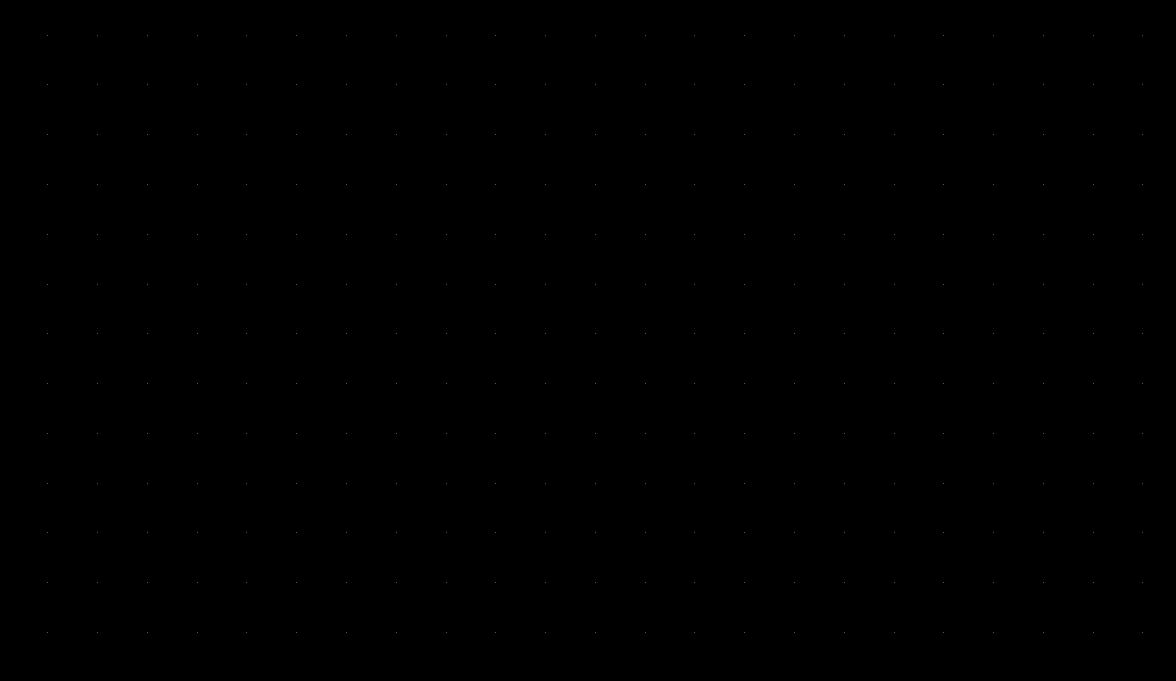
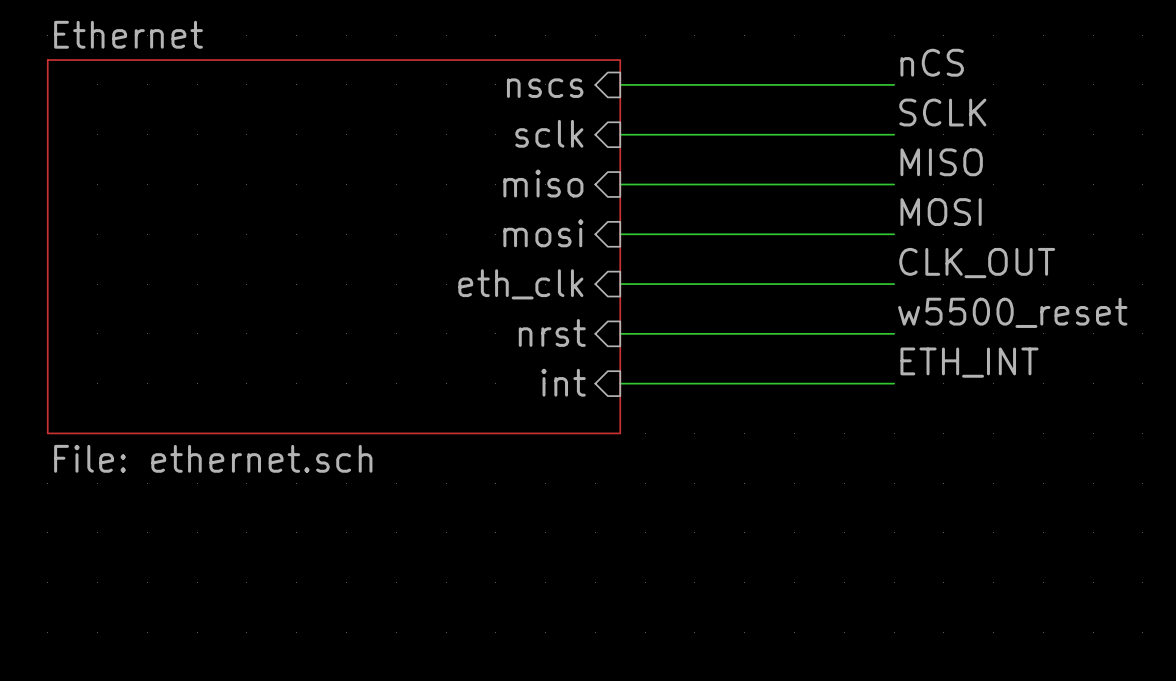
label: none -> nCS (932, 62)
wire: none -> (620, 84) (894, 84)
sheet pin: none -> nscs (545, 88)
label: none -> SCLK (942, 112)
sheet pin: none -> sclk (549, 133)
wire: none -> (620, 134) (894, 134)
label: none -> MISO (941, 162)
sheet pin: none -> miso (543, 183)
wire: none -> (620, 184) (894, 184)
label: none -> MOSI (941, 212)
sheet pin: none -> mosi (543, 233)
wire: none -> (620, 234) (894, 234)
sheet Ethernet: none -> File: ethernet.sch (333, 246)
label: none -> CLK_OUT (977, 263)
sheet pin: none -> eth_clk (520, 284)
wire: none -> (620, 284) (894, 284)
label: none -> w5500_reset (1012, 312)
sheet pin: none -> nrst (552, 332)
wire: none -> (620, 333) (894, 333)
label: none -> ETH_INT (969, 362)
sheet pin: none -> int (563, 382)
wire: none -> (620, 383) (894, 383)

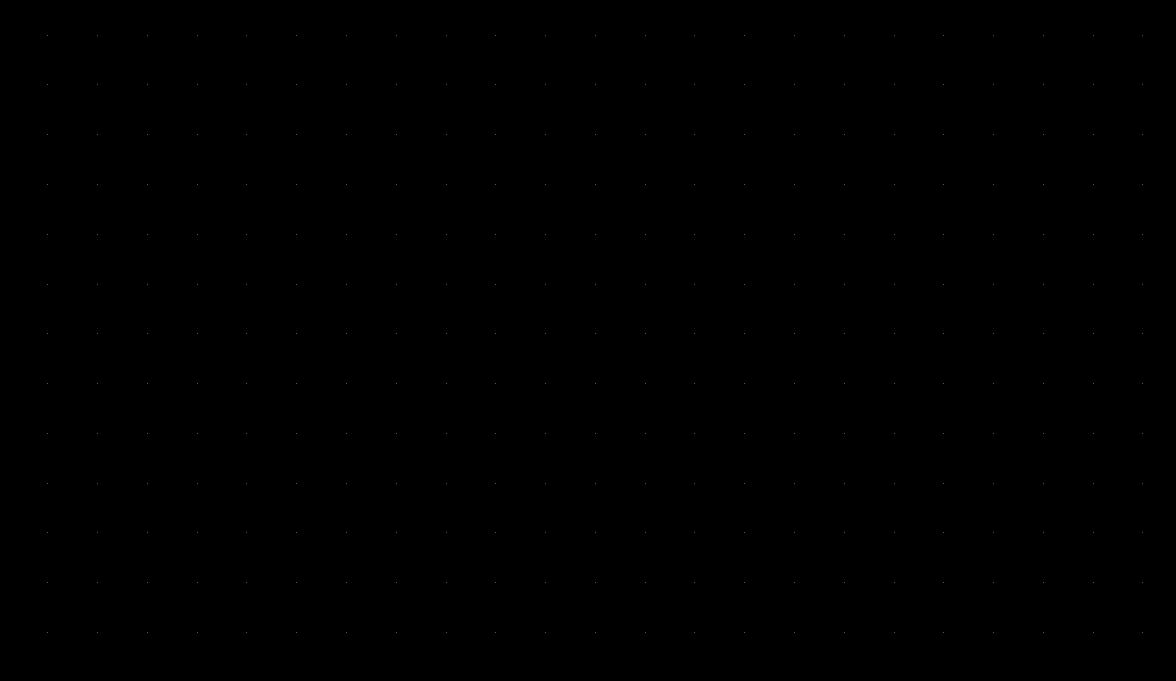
label: nCS (932, 62) -> none
wire: (620, 84) (894, 84) -> none
sheet pin: nscs (545, 88) -> none
label: SCLK (942, 112) -> none
sheet pin: sclk (549, 133) -> none
wire: (620, 134) (894, 134) -> none
label: MISO (941, 162) -> none
sheet pin: miso (543, 183) -> none
wire: (620, 184) (894, 184) -> none
label: MOSI (941, 212) -> none
sheet pin: mosi (543, 233) -> none
wire: (620, 234) (894, 234) -> none
sheet Ethernet: File: ethernet.sch (333, 246) -> none
label: CLK_OUT (977, 263) -> none
sheet pin: eth_clk (520, 284) -> none
wire: (620, 284) (894, 284) -> none
label: w5500_reset (1012, 312) -> none
sheet pin: nrst (552, 332) -> none
wire: (620, 333) (894, 333) -> none
label: ETH_INT (969, 362) -> none
sheet pin: int (563, 382) -> none
wire: (620, 383) (894, 383) -> none

